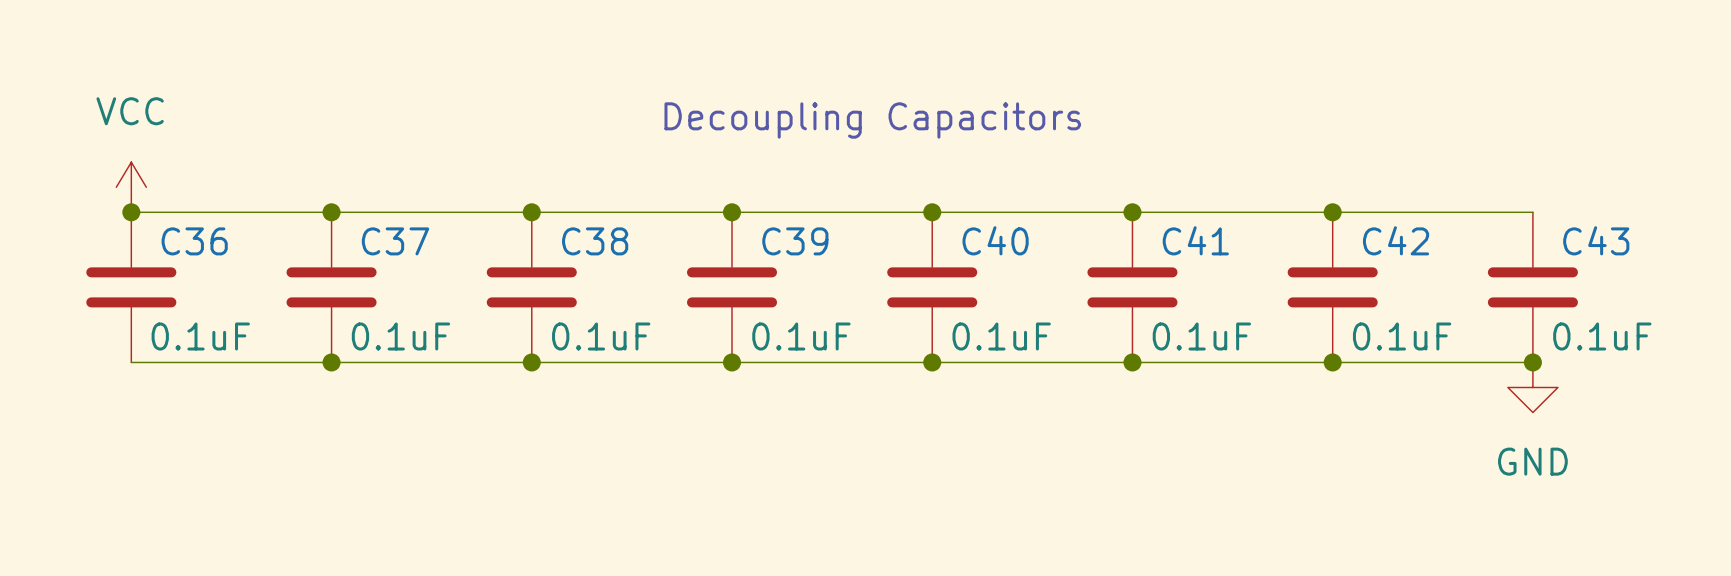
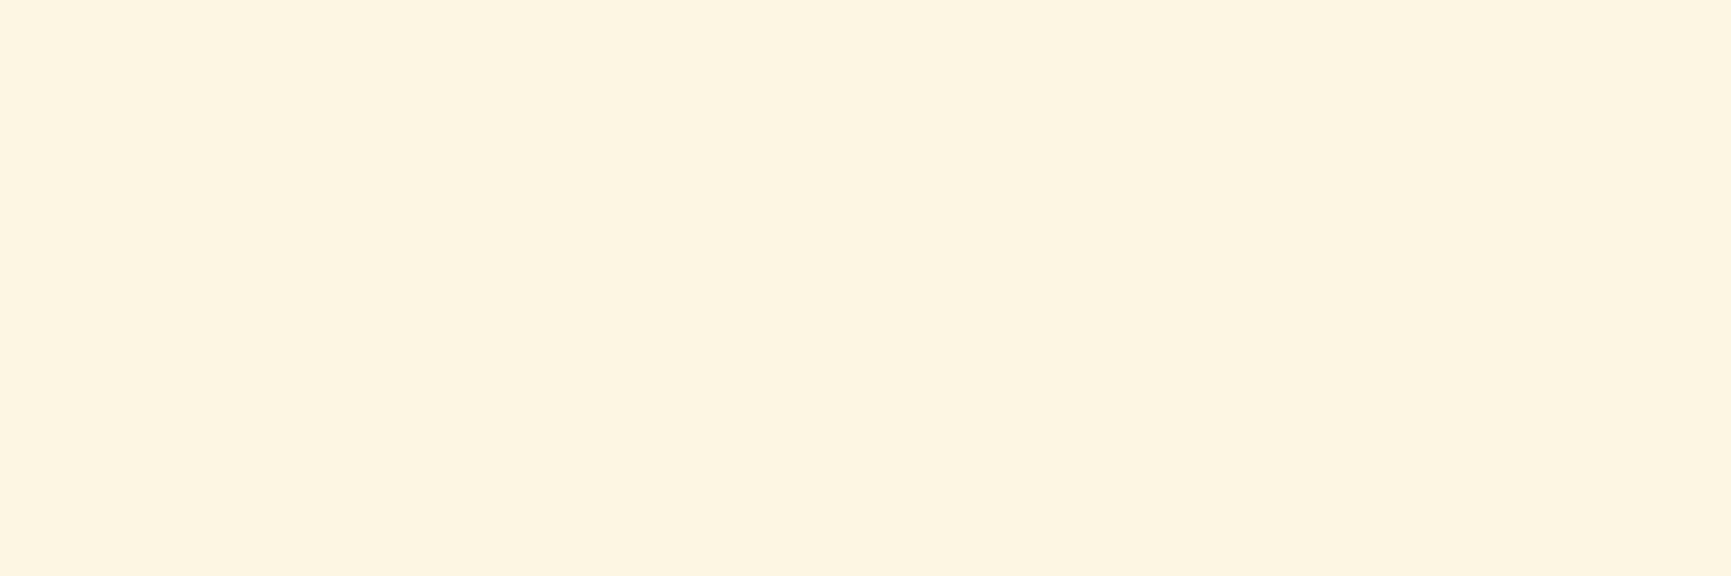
text: Decoupling Capacitors (872, 120) -> none
power symbol: VCC (131, 187) -> none
wire: (131, 212) (1532, 212) -> none
junction: (131, 212) -> none
junction: (331, 212) -> none
junction: (531, 212) -> none
junction: (732, 212) -> none
junction: (932, 212) -> none
junction: (1132, 212) -> none
junction: (1332, 212) -> none
C36: 0.1uF (131, 287) -> none
C37: 0.1uF (331, 287) -> none
C38: 0.1uF (531, 287) -> none
C39: 0.1uF (732, 287) -> none
C40: 0.1uF (932, 287) -> none
C41: 0.1uF (1132, 287) -> none
C42: 0.1uF (1332, 287) -> none
C43: 0.1uF (1532, 287) -> none
wire: (131, 362) (1532, 362) -> none
junction: (331, 362) -> none
junction: (531, 362) -> none
junction: (732, 362) -> none
junction: (932, 362) -> none
junction: (1132, 362) -> none
junction: (1332, 362) -> none
junction: (1532, 362) -> none
power symbol: GND (1532, 387) -> none

